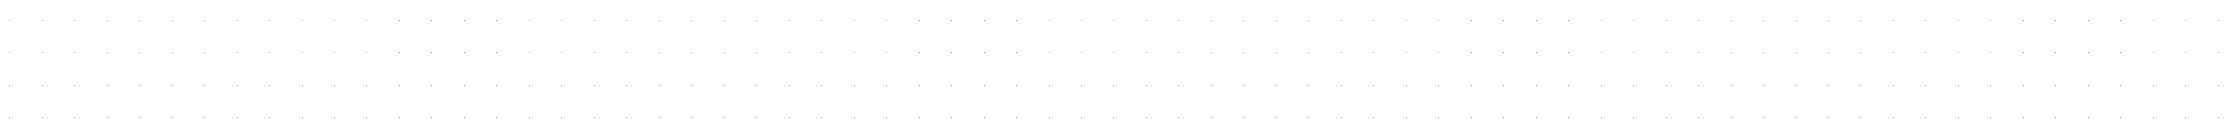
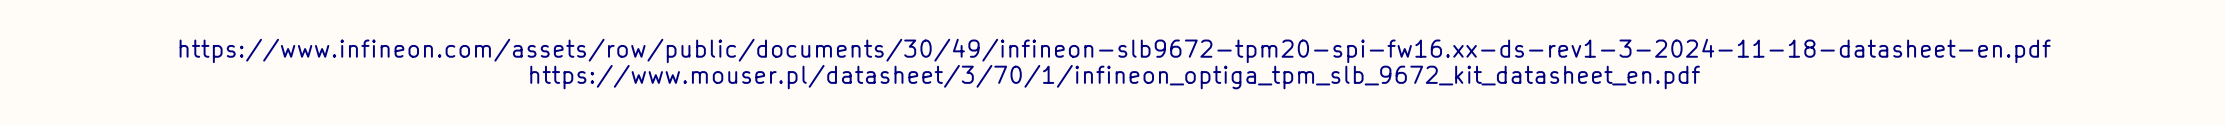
text: none -> https://www.infineon.com/assets/row/public/documents/30/49/infineon-slb9672-tpm20-spi-fw16.xx-ds-rev1-3-2024-11-18-datasheet-en.pdf (1115, 50)
text: none -> https://www.mouser.pl/datasheet/3/70/1/infineon_optiga_tpm_slb_9672_kit_datasheet_en.pdf (1115, 77)

